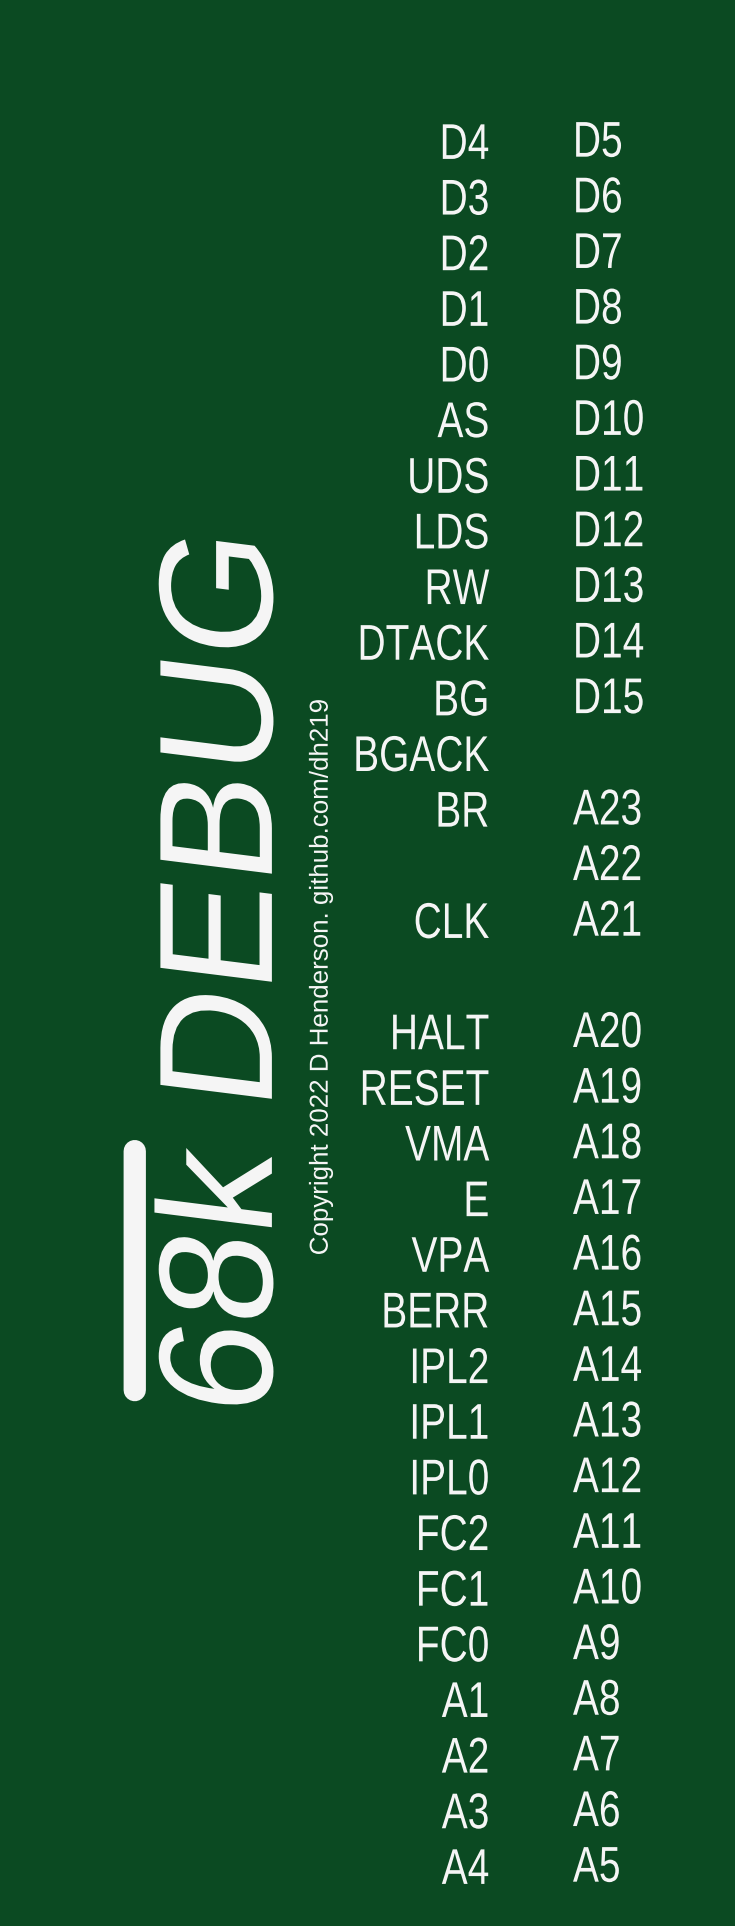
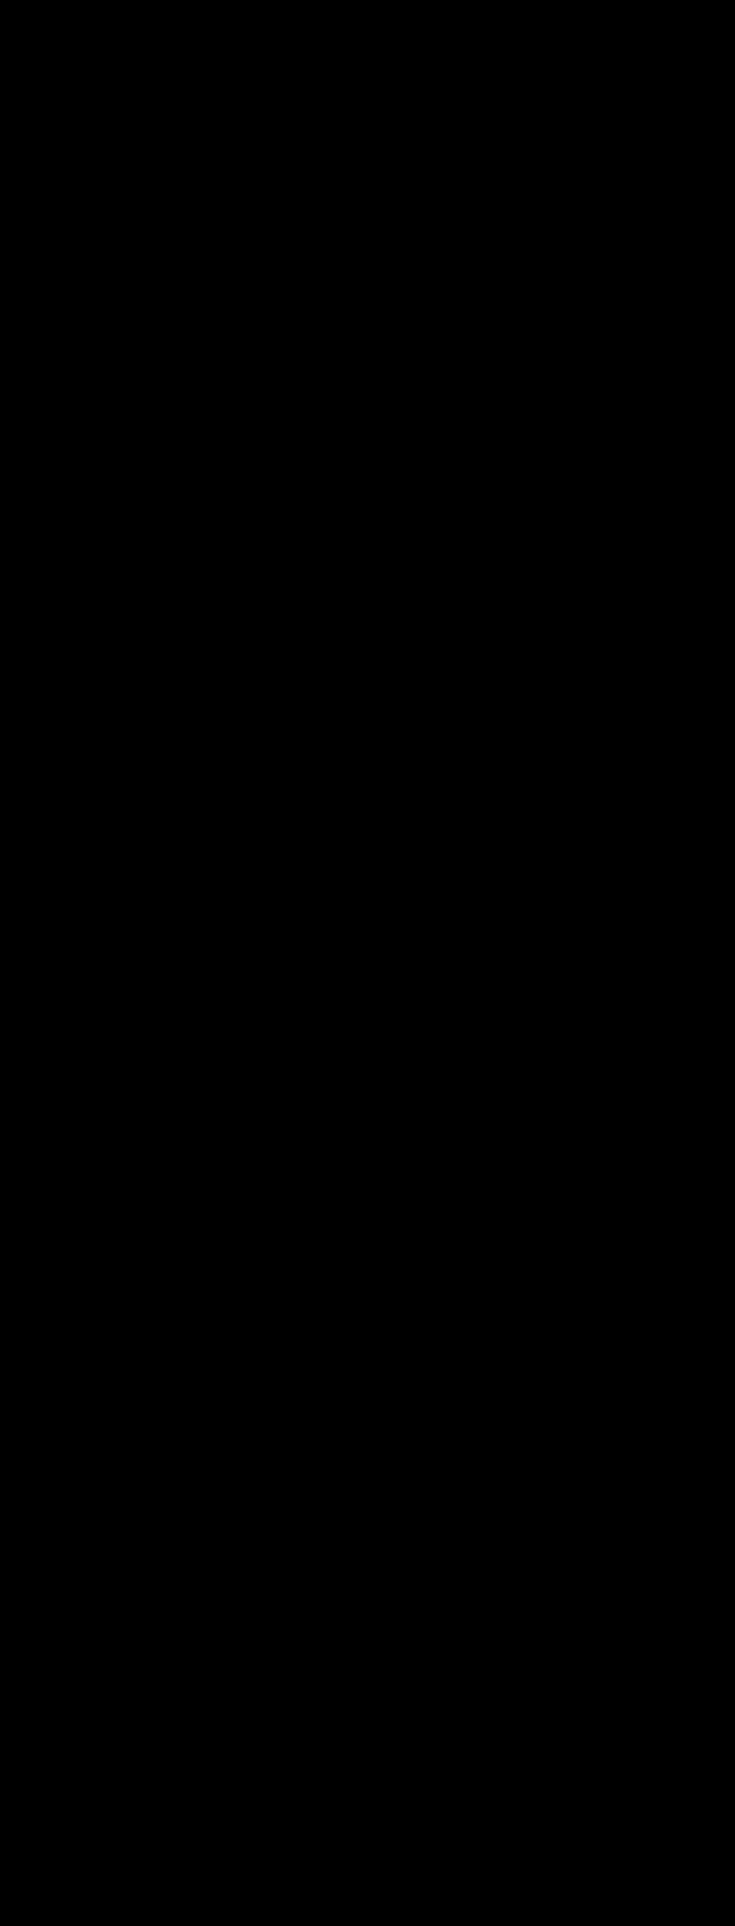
text: D5 (598, 139) -> none
text: D4 (465, 141) -> none
text: D6 (598, 195) -> none
text: D3 (465, 197) -> none
text: D7 (598, 250) -> none
text: D2 (465, 252) -> none
text: D8 (598, 306) -> none
text: D1 (465, 308) -> none
text: D9 (598, 361) -> none
text: D0 (465, 364) -> none
text: D10 (609, 417) -> none
text: AS (462, 419) -> none
text: D11 (609, 473) -> none
text: UDS (448, 475) -> none
text: D12 (609, 528) -> none
text: LDS (452, 531) -> none
text: D13 (609, 584) -> none
text: RW (458, 586) -> none
text: D14 (609, 640) -> none
text: DTACK (424, 642) -> none
text: D15 (609, 696) -> none
text: BG (461, 698) -> none
text: BGACK (422, 753) -> none
text: A23 (606, 807) -> none
text: BR (463, 809) -> none
text: A22 (606, 862) -> none
text: A21 (606, 918) -> none
text: CLK (452, 920) -> none
text: ~{68k} DEBUG (204, 973) -> none
text: Copyright 2022 D Henderson. github.com/dh219 (320, 977) -> none
text: A20 (606, 1029) -> none
text: HALT (440, 1031) -> none
text: A19 (606, 1085) -> none
text: RESET (425, 1087) -> none
text: A18 (606, 1140) -> none
text: VMA (447, 1143) -> none
text: A17 (606, 1196) -> none
text: E (477, 1198) -> none
text: A16 (606, 1252) -> none
text: VPA (450, 1254) -> none
text: A15 (606, 1308) -> none
text: BERR (435, 1310) -> none
text: A14 (607, 1363) -> none
text: IPL2 (450, 1365) -> none
text: A13 (606, 1419) -> none
text: IPL1 (450, 1421) -> none
text: A12 (606, 1474) -> none
text: IPL0 (450, 1477) -> none
text: A11 (606, 1530) -> none
text: FC2 (453, 1532) -> none
text: A10 (606, 1586) -> none
text: FC1 (453, 1588) -> none
text: A9 (595, 1641) -> none
text: FC0 (453, 1644) -> none
text: A8 (595, 1697) -> none
text: A1 (464, 1699) -> none
text: A7 (595, 1753) -> none
text: A2 (464, 1755) -> none
text: A6 (595, 1808) -> none
text: A3 (464, 1810) -> none
text: A5 (595, 1864) -> none
text: A4 (465, 1866) -> none

